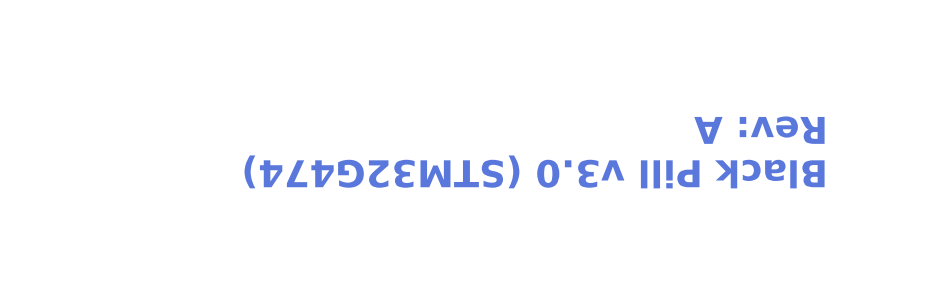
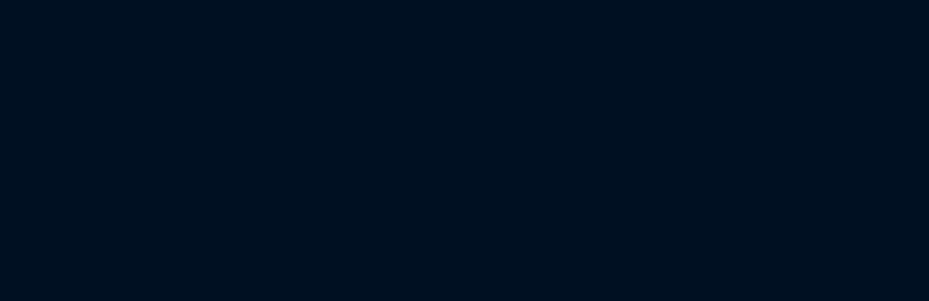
text: Rev: A (759, 130) -> none
text: Black Pill v3.0 (STM32G474) (534, 171) -> none

